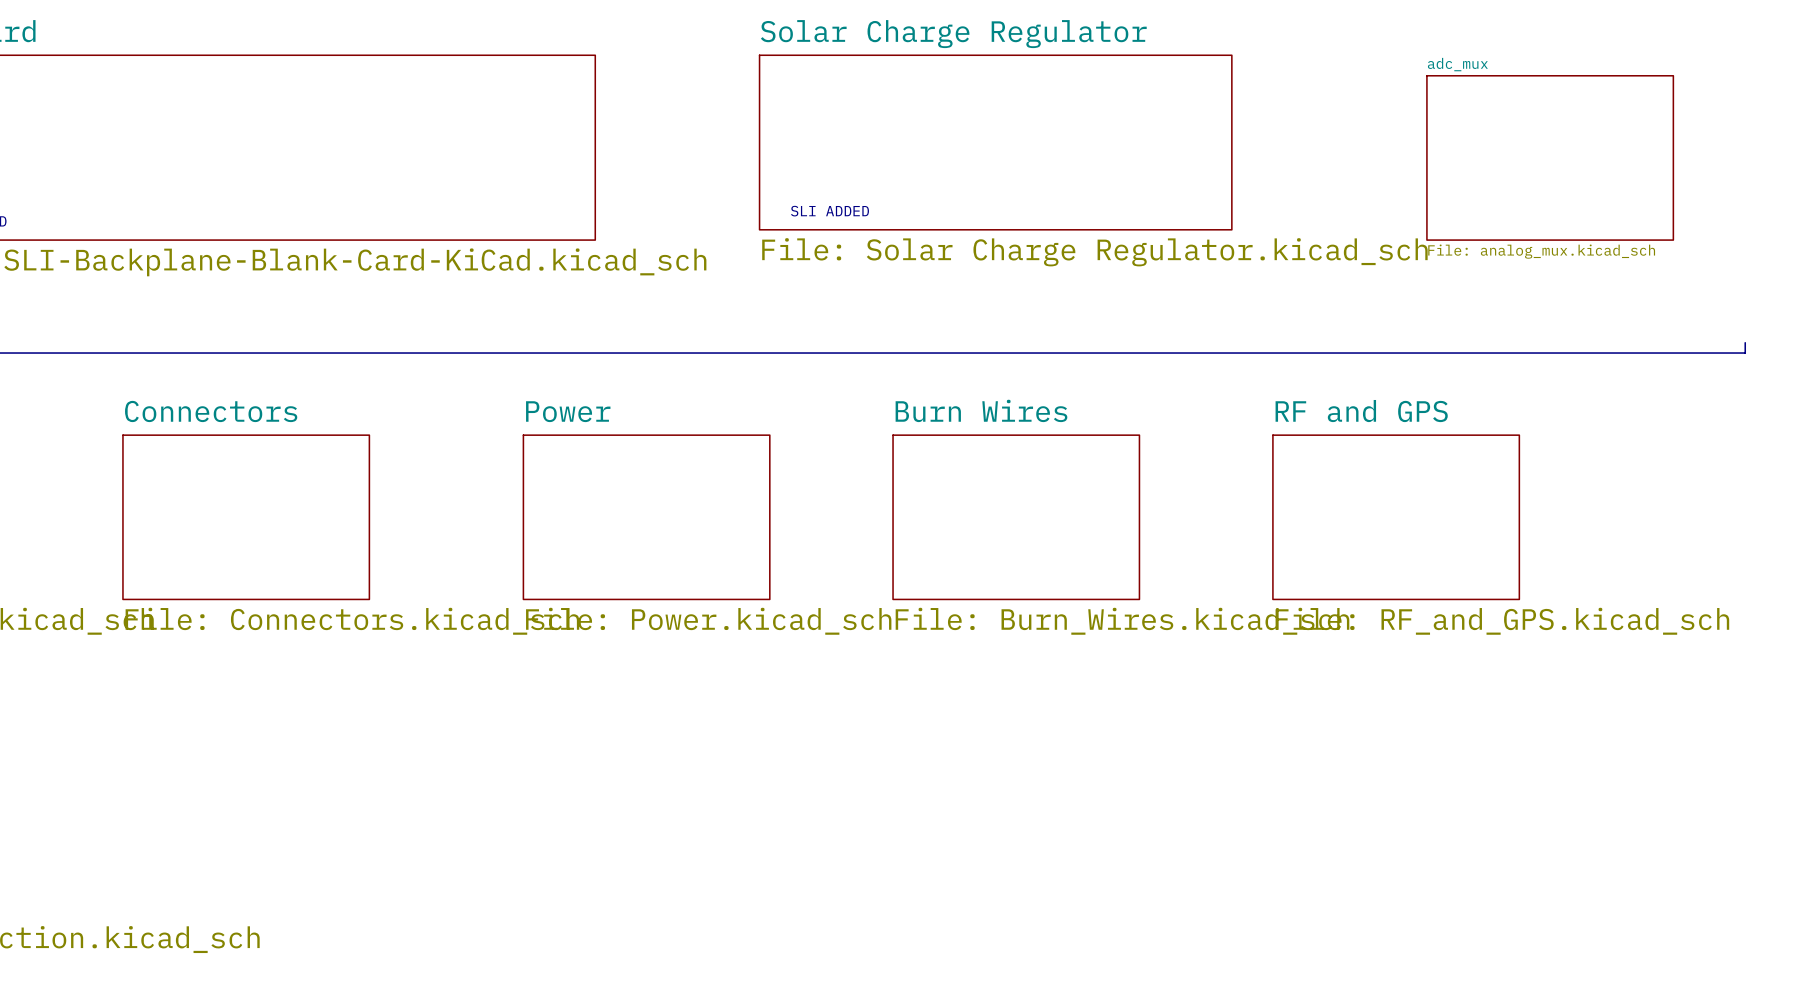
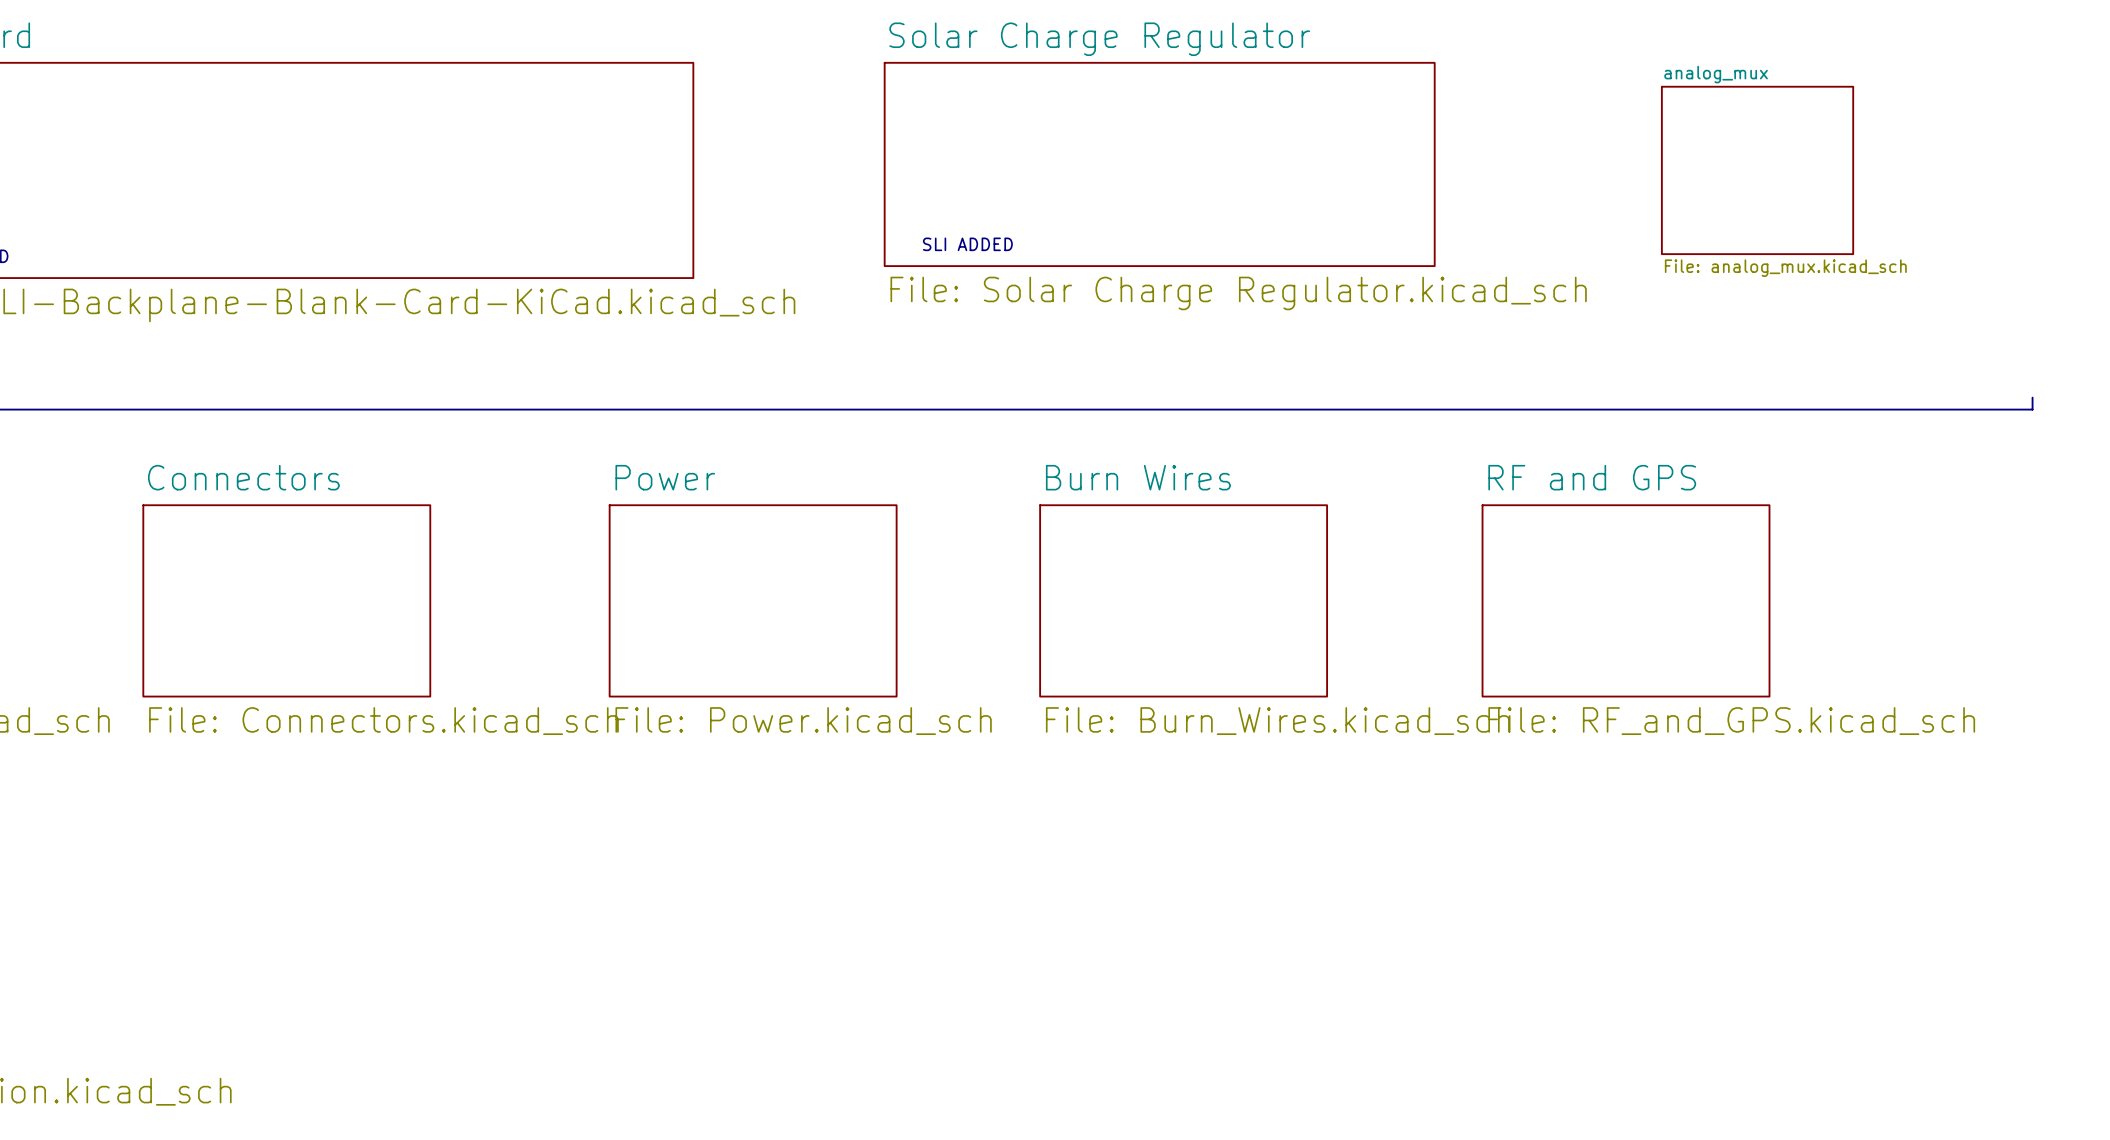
sheet analog_mux: none -> File: analog_mux.kicad_sch (1757, 170)
sheet adc_mux: File: analog_mux.kicad_sch (1550, 157) -> none

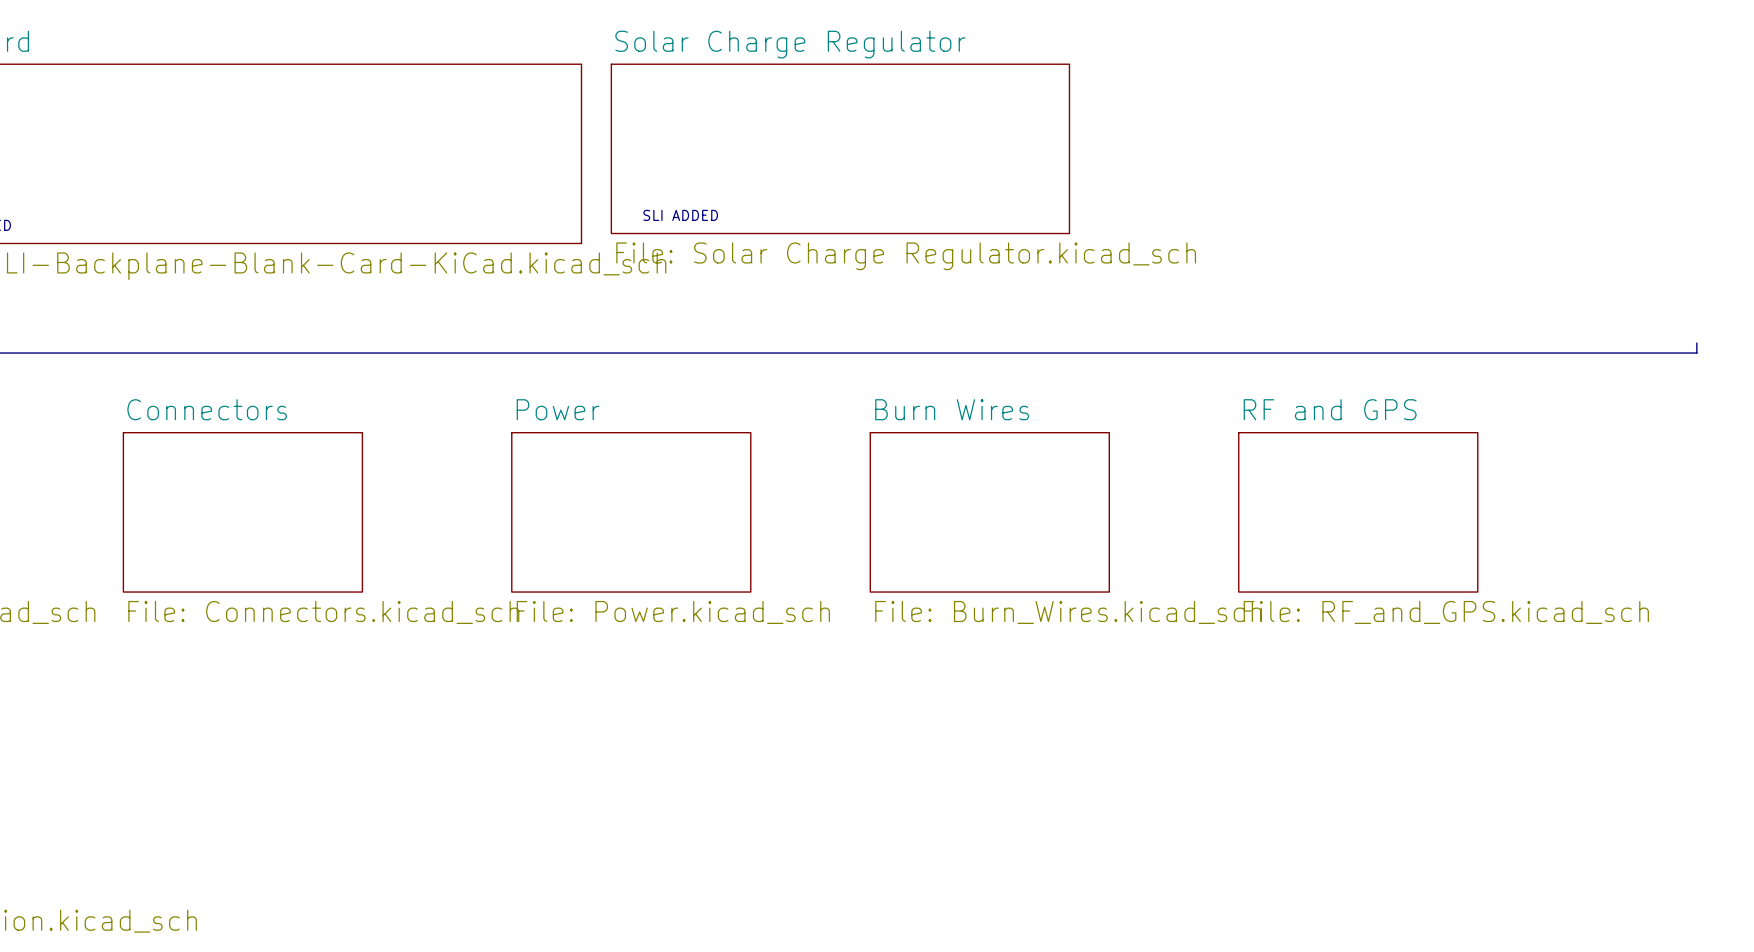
sheet Solar Charge Regulator position: (1159, 164) -> (840, 148)
sheet analog_mux: File: analog_mux.kicad_sch (1757, 170) -> none
text position: SLI ADDED (967, 244) -> SLI ADDED (680, 215)

